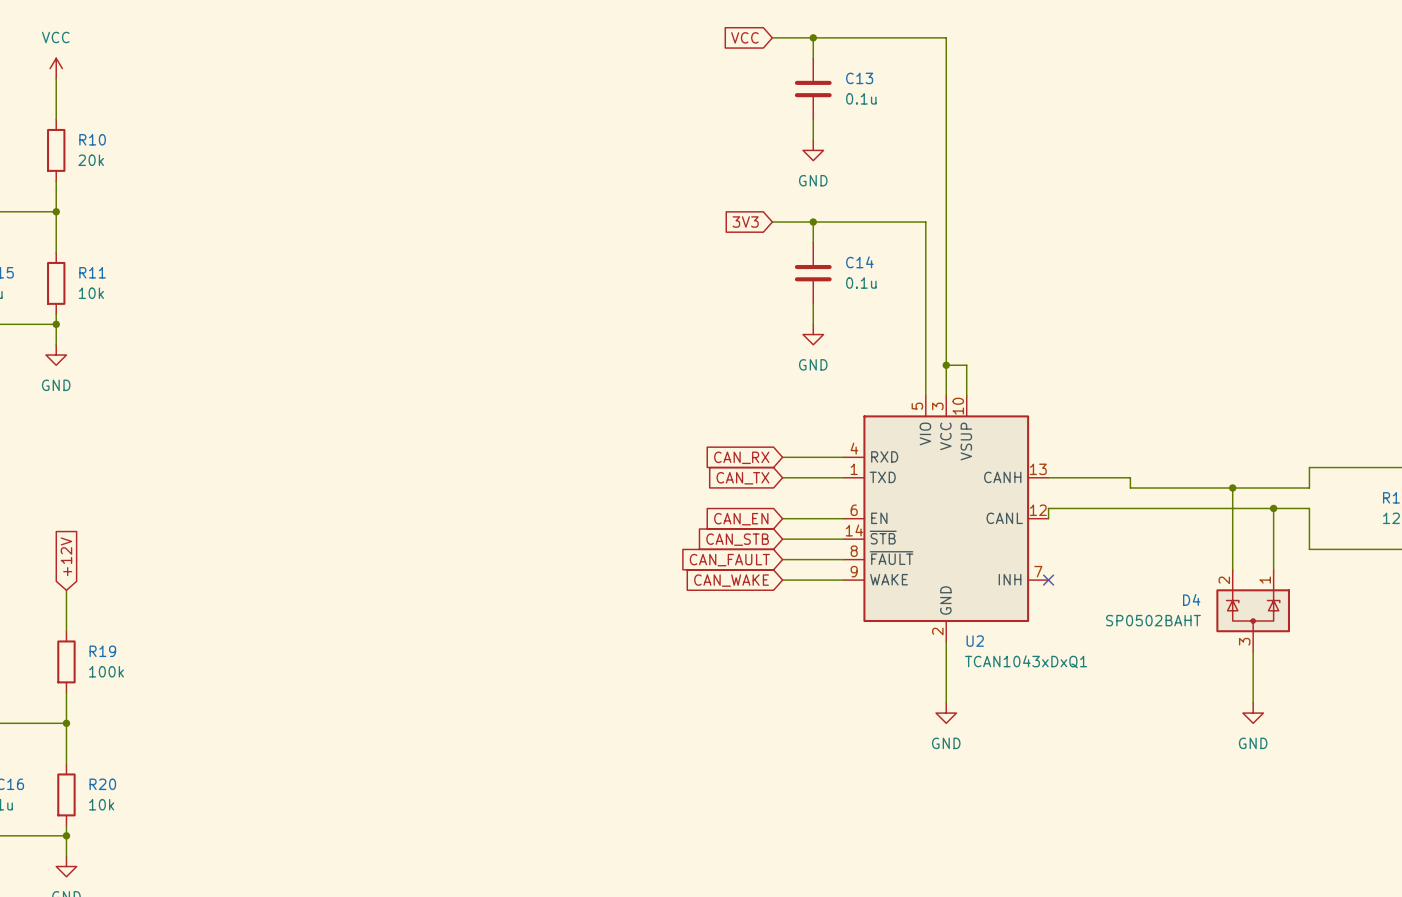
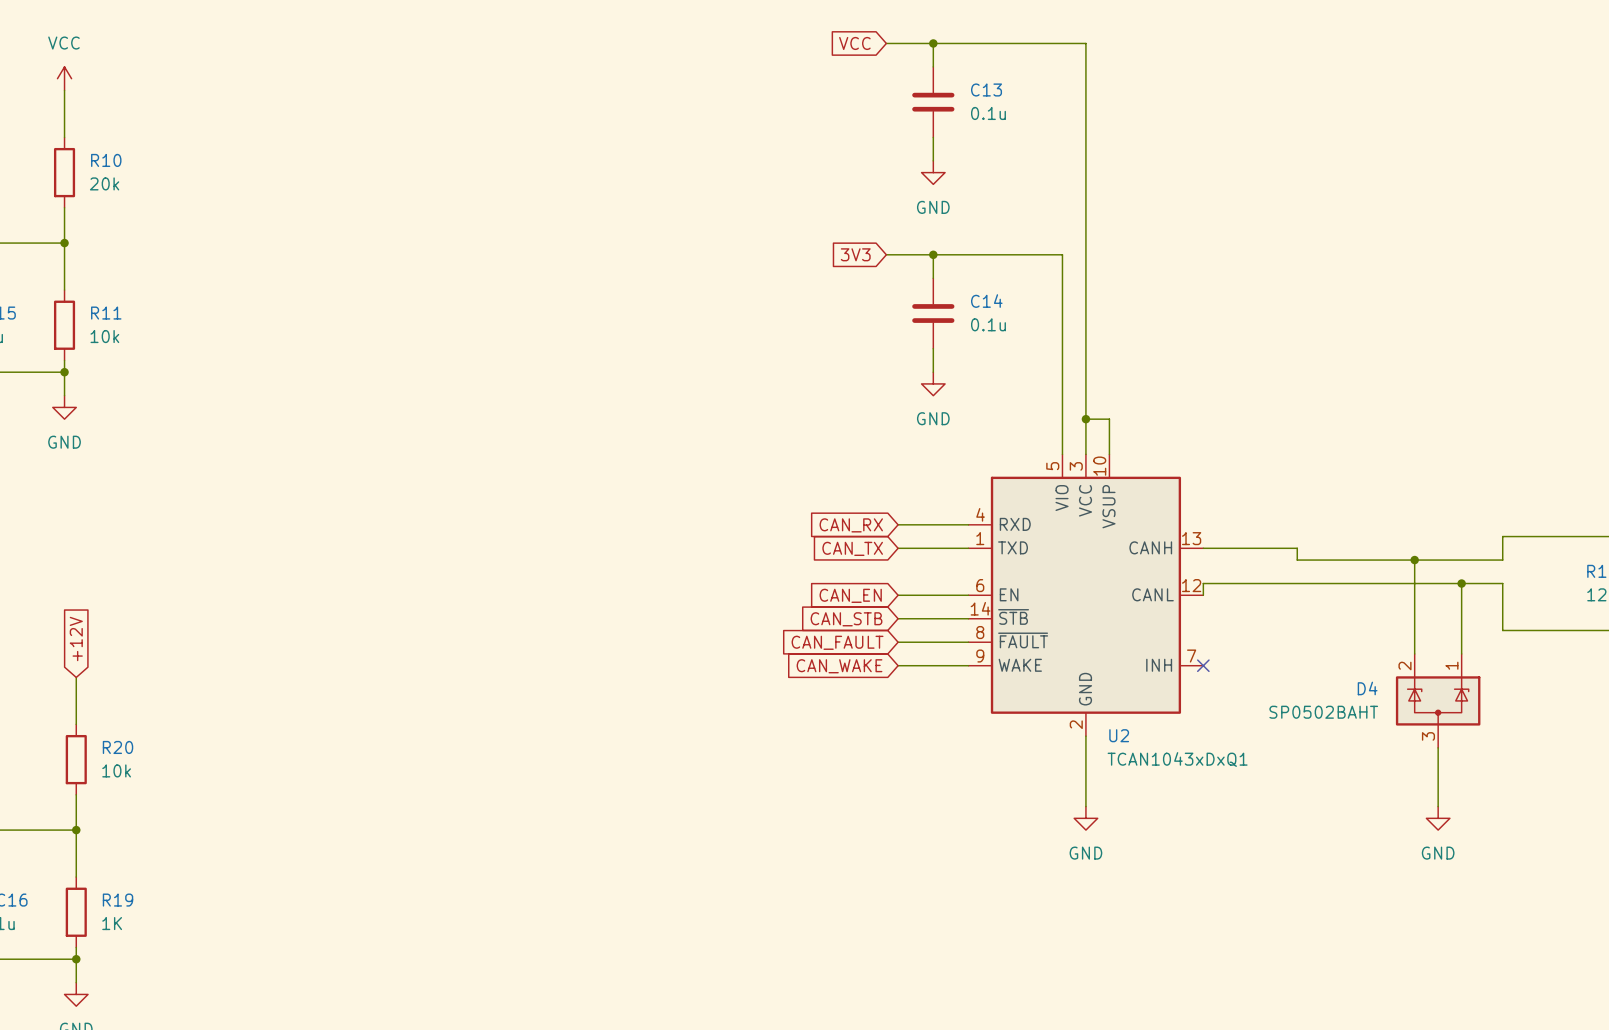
R19 name: R19 (102, 651) -> R20 (118, 747)
R19 value: 100k (106, 671) -> 10k (116, 770)
R20 name: R20 (102, 784) -> R19 (118, 900)
R20 value: 10k (101, 804) -> 1K (112, 923)

